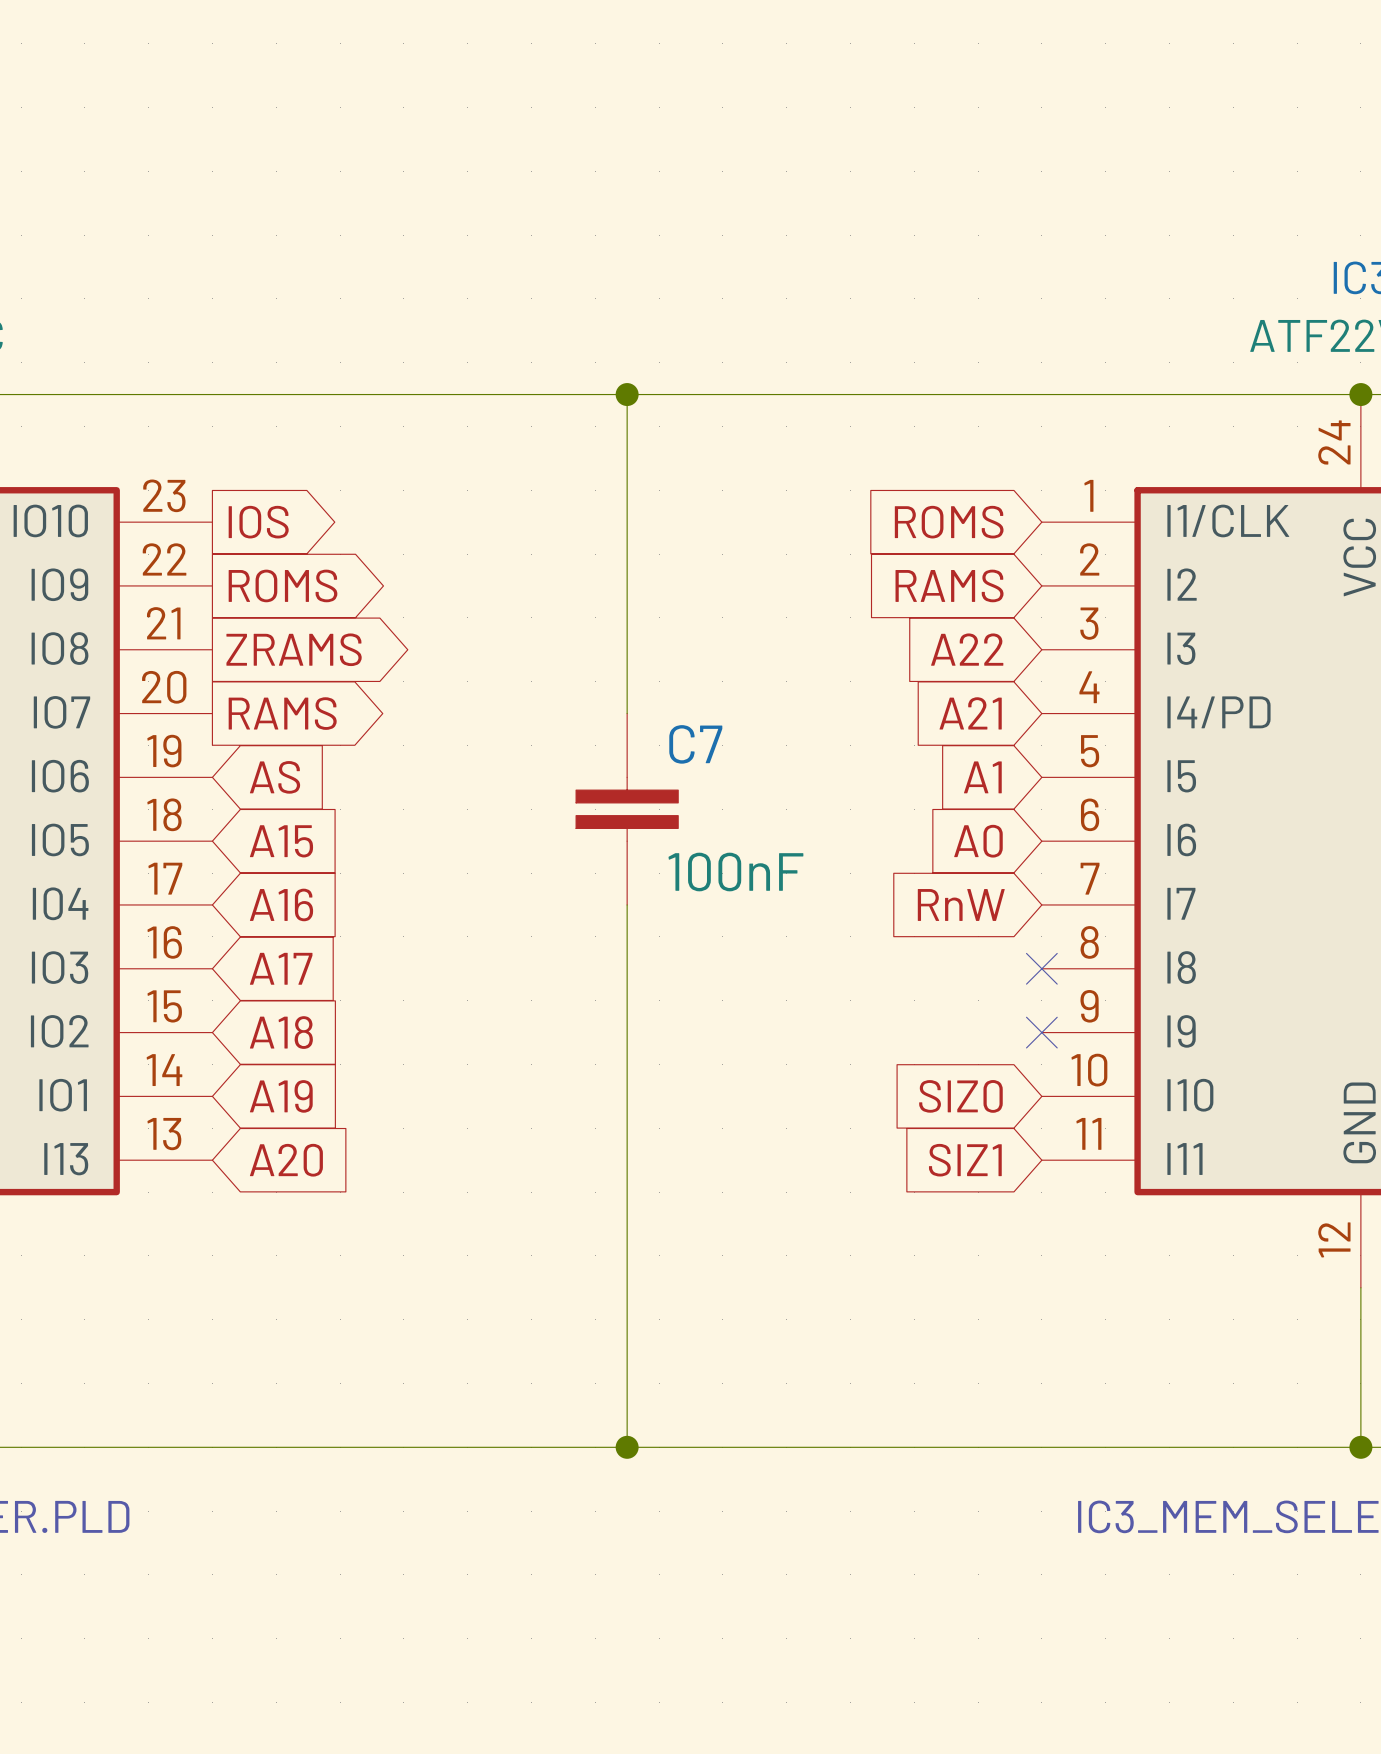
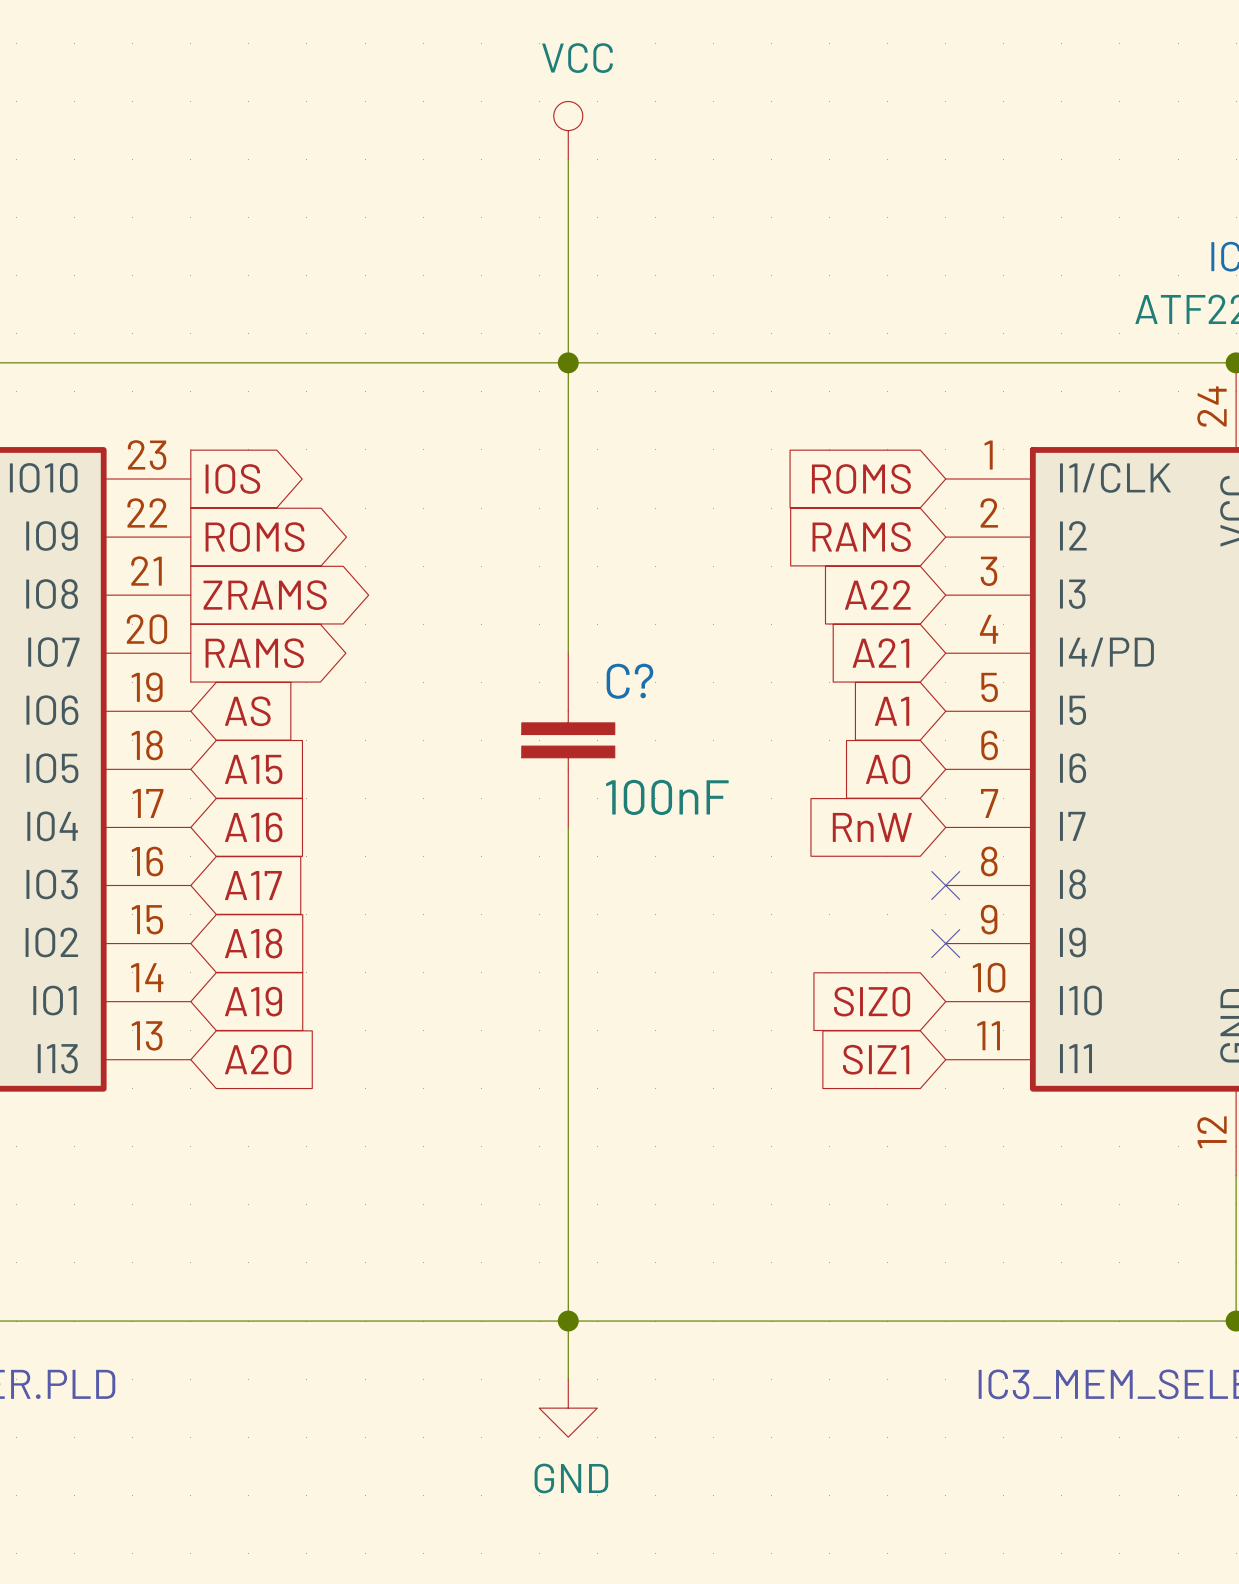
power symbol: none -> VCC (568, 130)
wire: none -> (568, 159) (568, 362)
C7 name: C7 (695, 744) -> C? (629, 681)
wire: none -> (568, 1321) (568, 1379)
power symbol: none -> GND (568, 1408)

